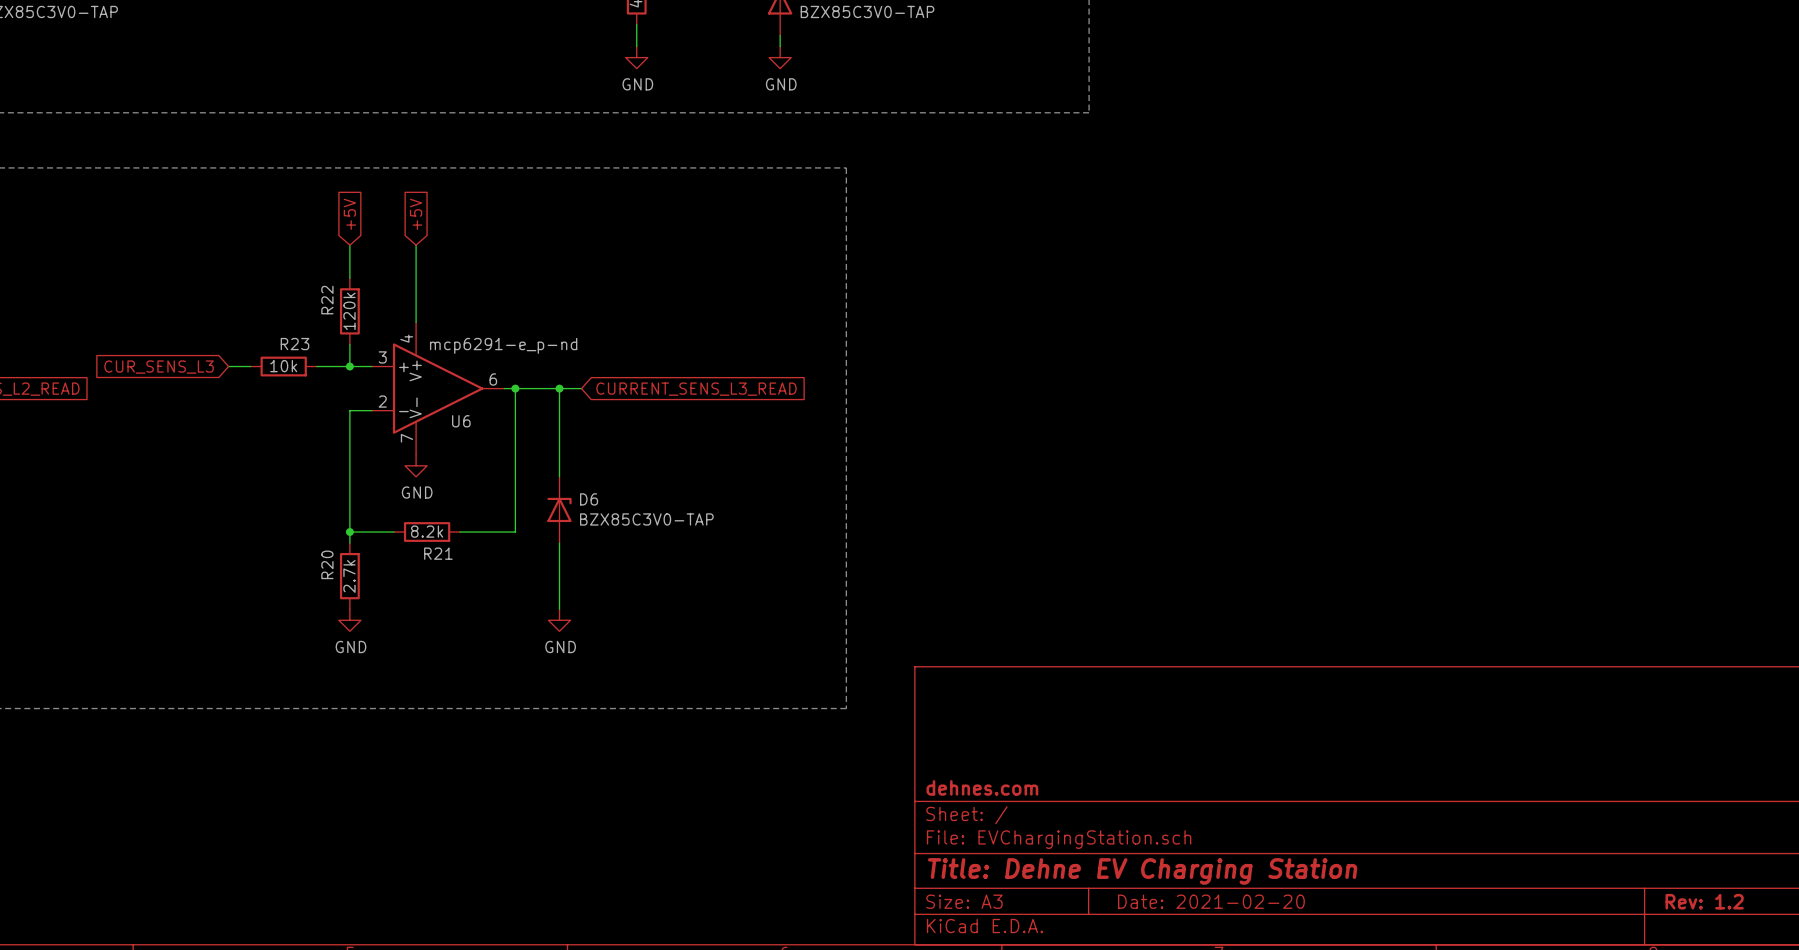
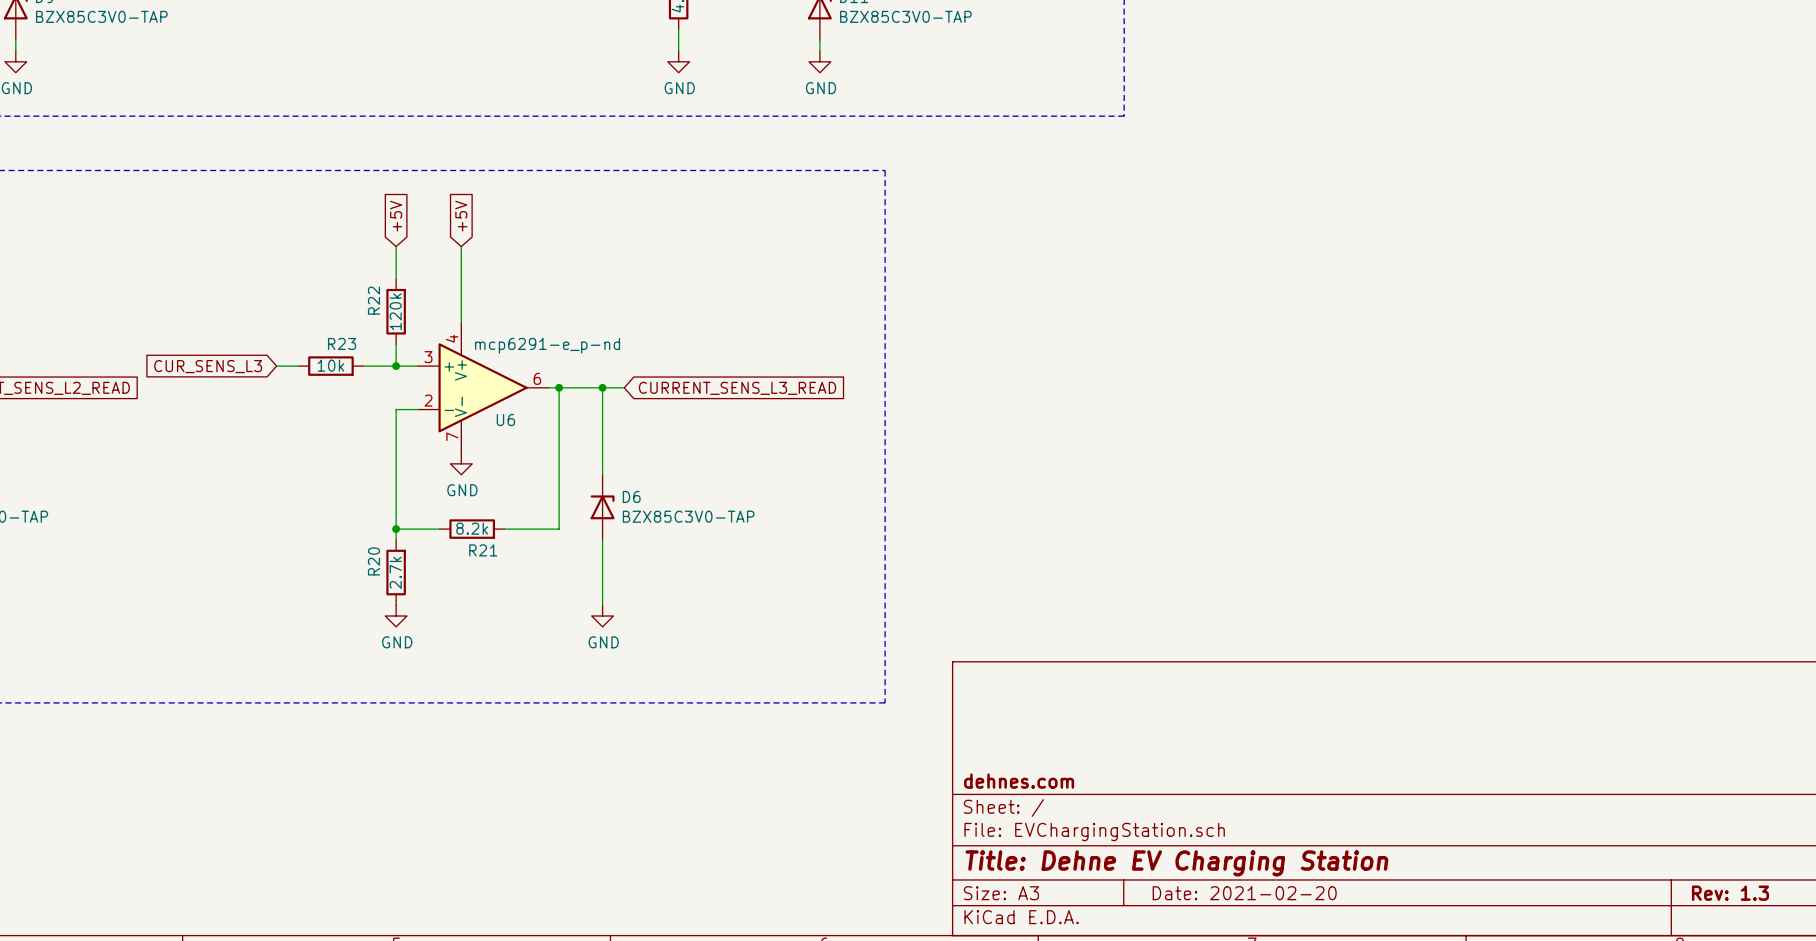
title block: Rev: 1.2 (1704, 901) -> Rev: 1.3 (1730, 893)

